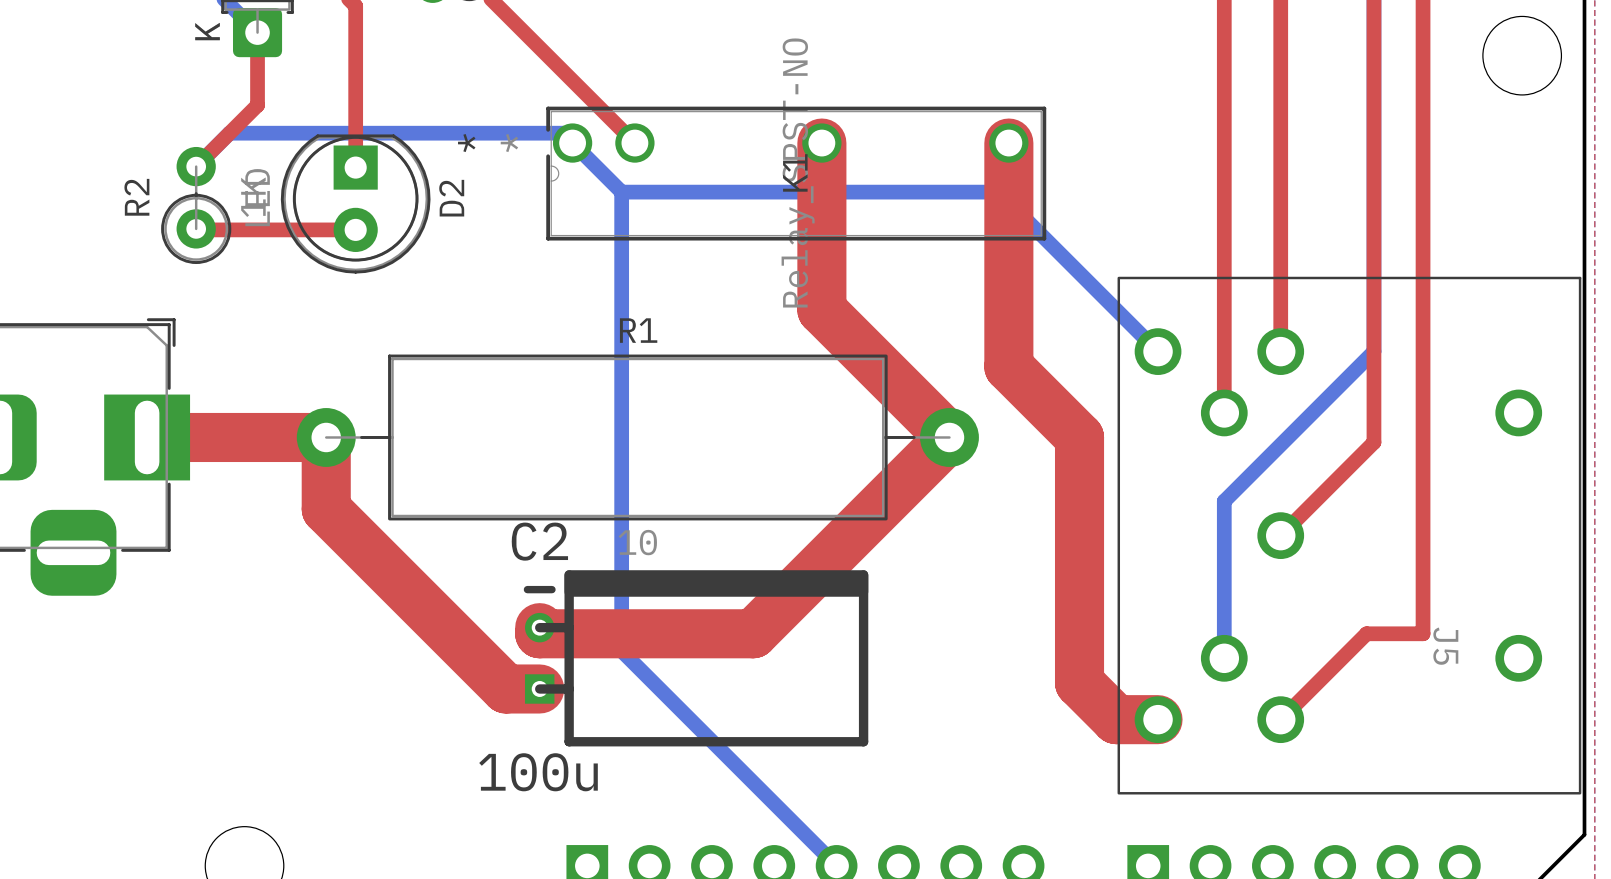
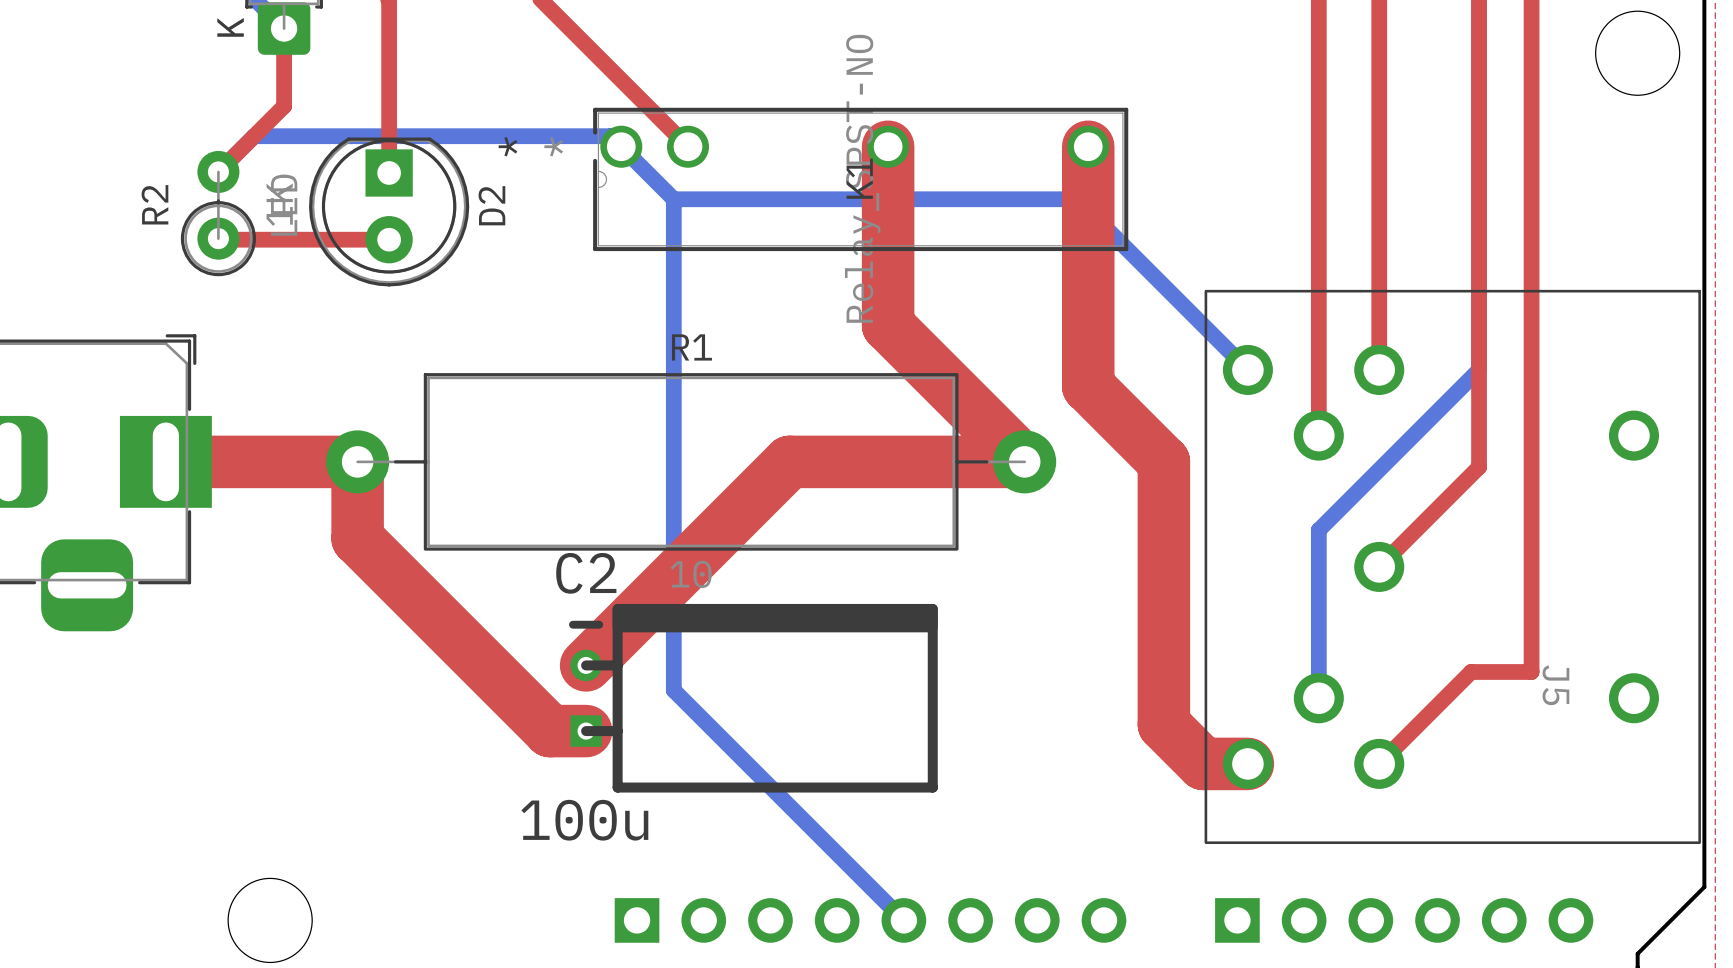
top track: (949, 437) (753, 633) (539, 633) (539, 627) -> (1024, 461) (789, 461) (586, 665)

